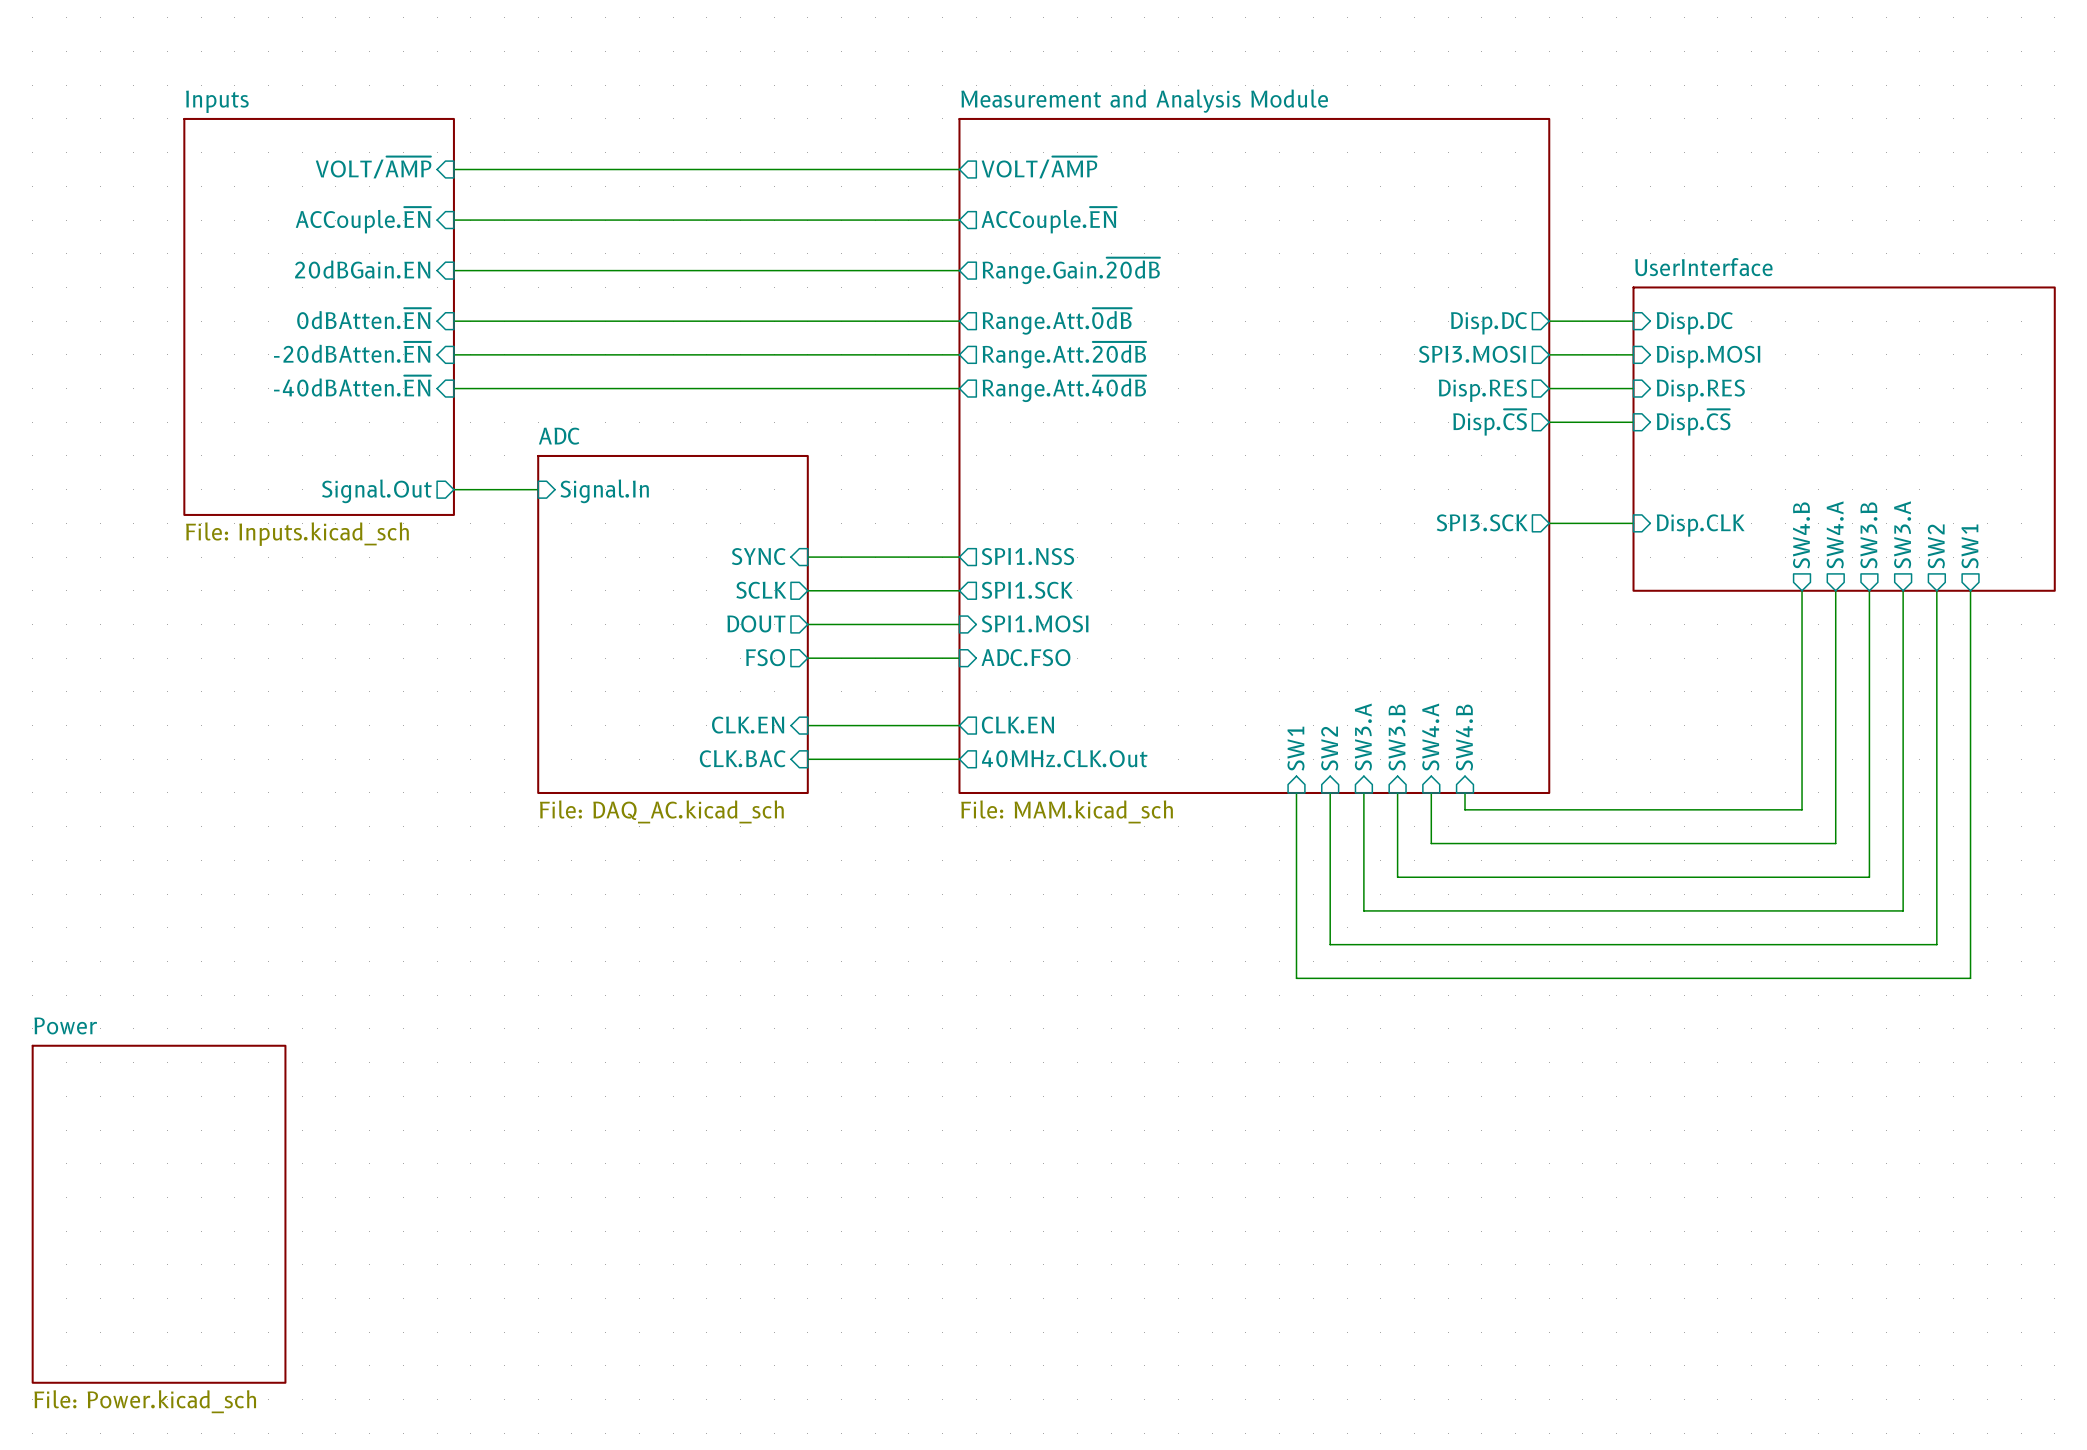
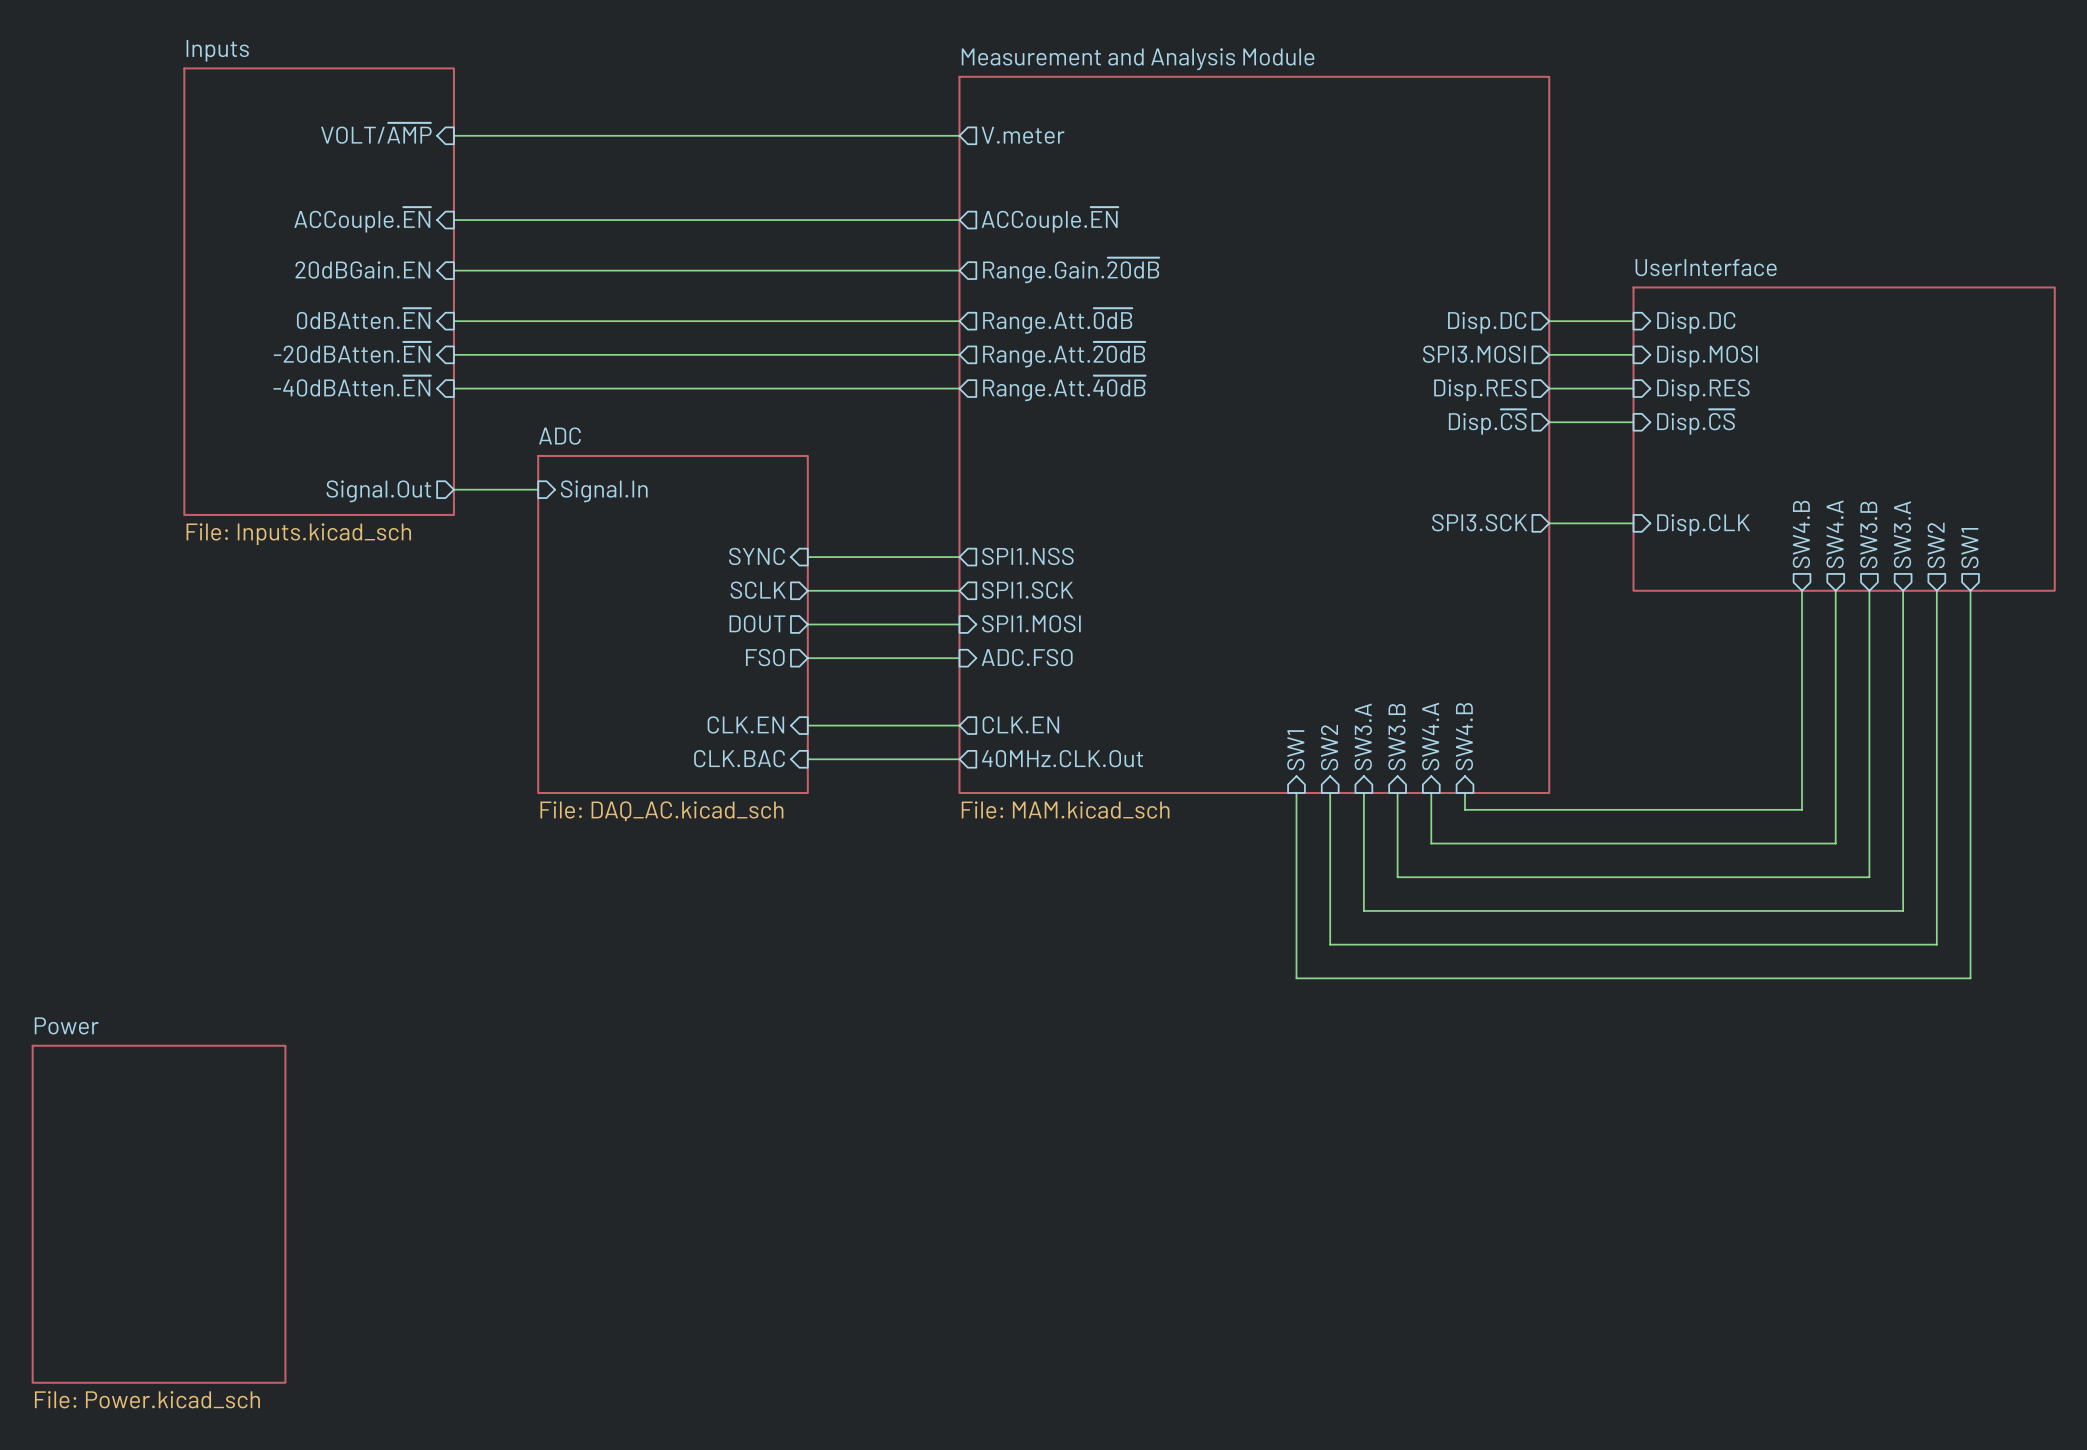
sheet pin: none -> V.meter (1023, 135)
sheet pin position: VOLT/~{AMP} (373, 167) -> VOLT/~{AMP} (376, 133)
sheet pin: VOLT/~{AMP} (1039, 167) -> none
wire: (453, 169) (959, 169) -> (453, 135) (959, 135)
sheet Inputs: none -> File: Inputs.kicad_sch (319, 291)
sheet Inputs: File: Inputs.kicad_sch (319, 316) -> none
sheet Measurement and Analysis Module: none -> File: MAM.kicad_sch (1254, 434)
sheet Measurement and Analysis Module: File: MAM.kicad_sch (1254, 455) -> none

